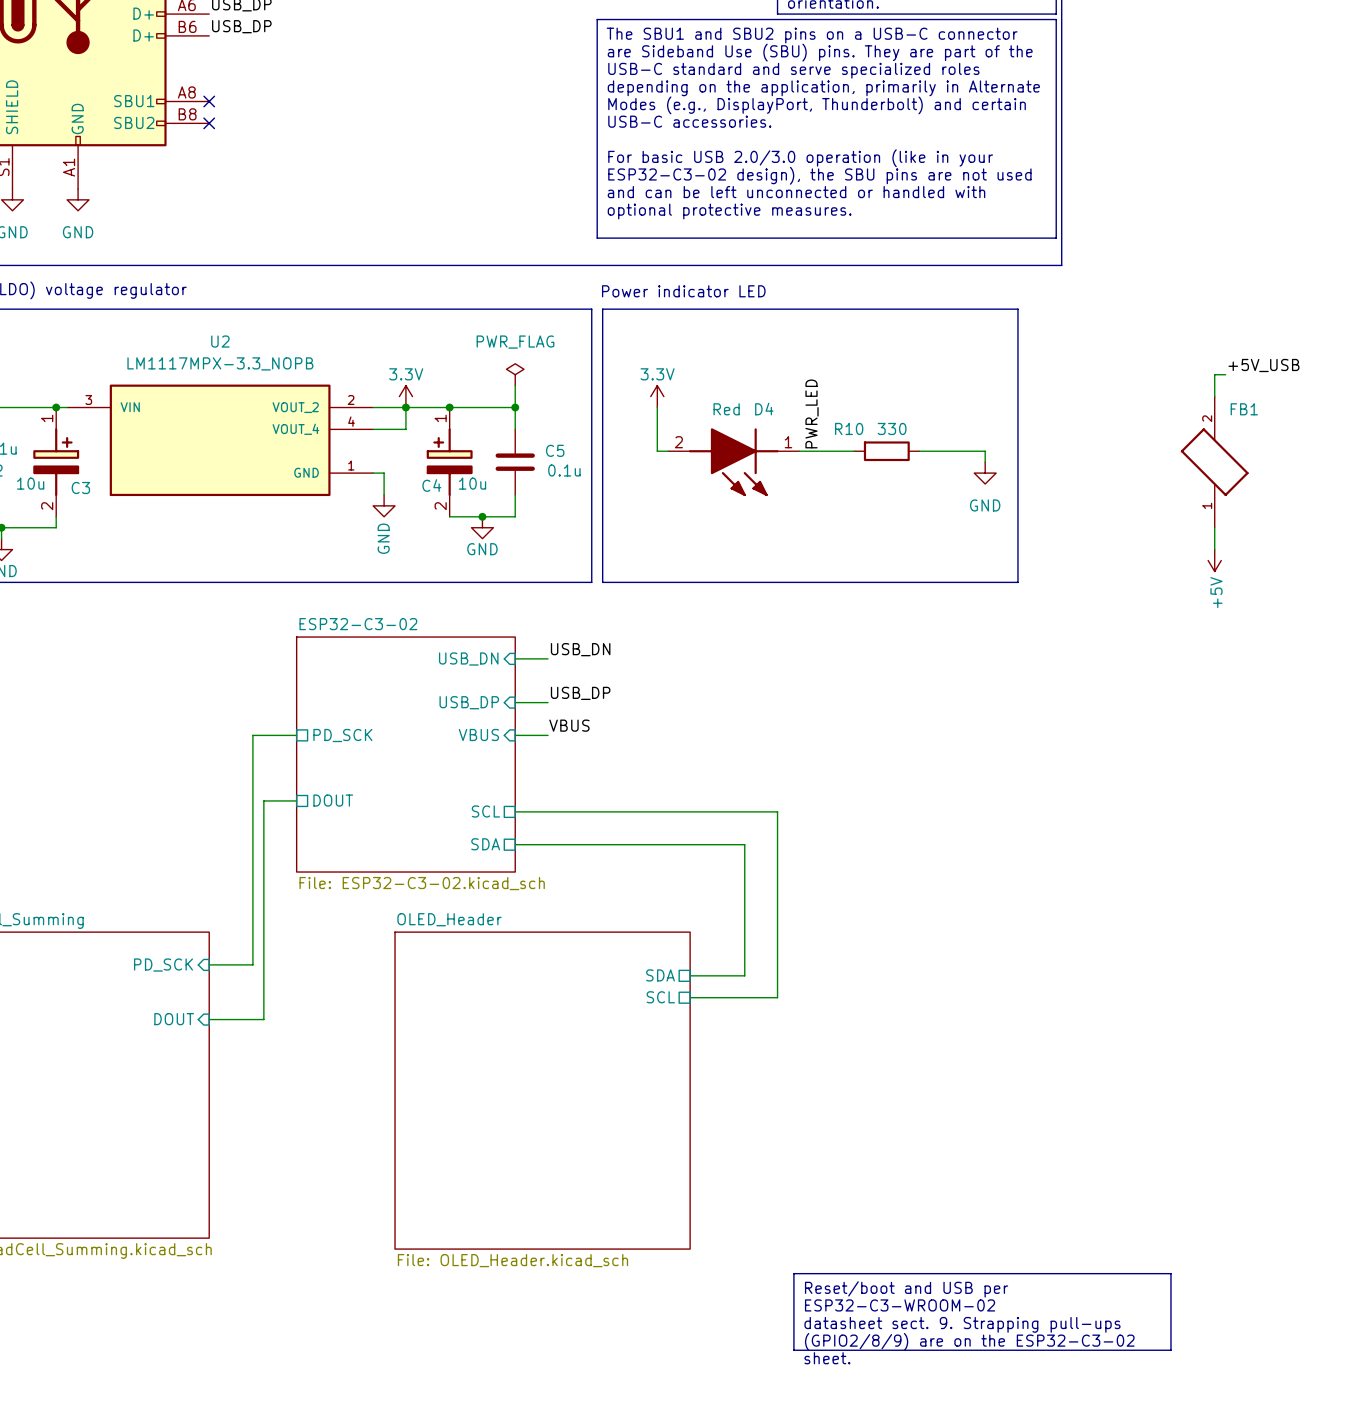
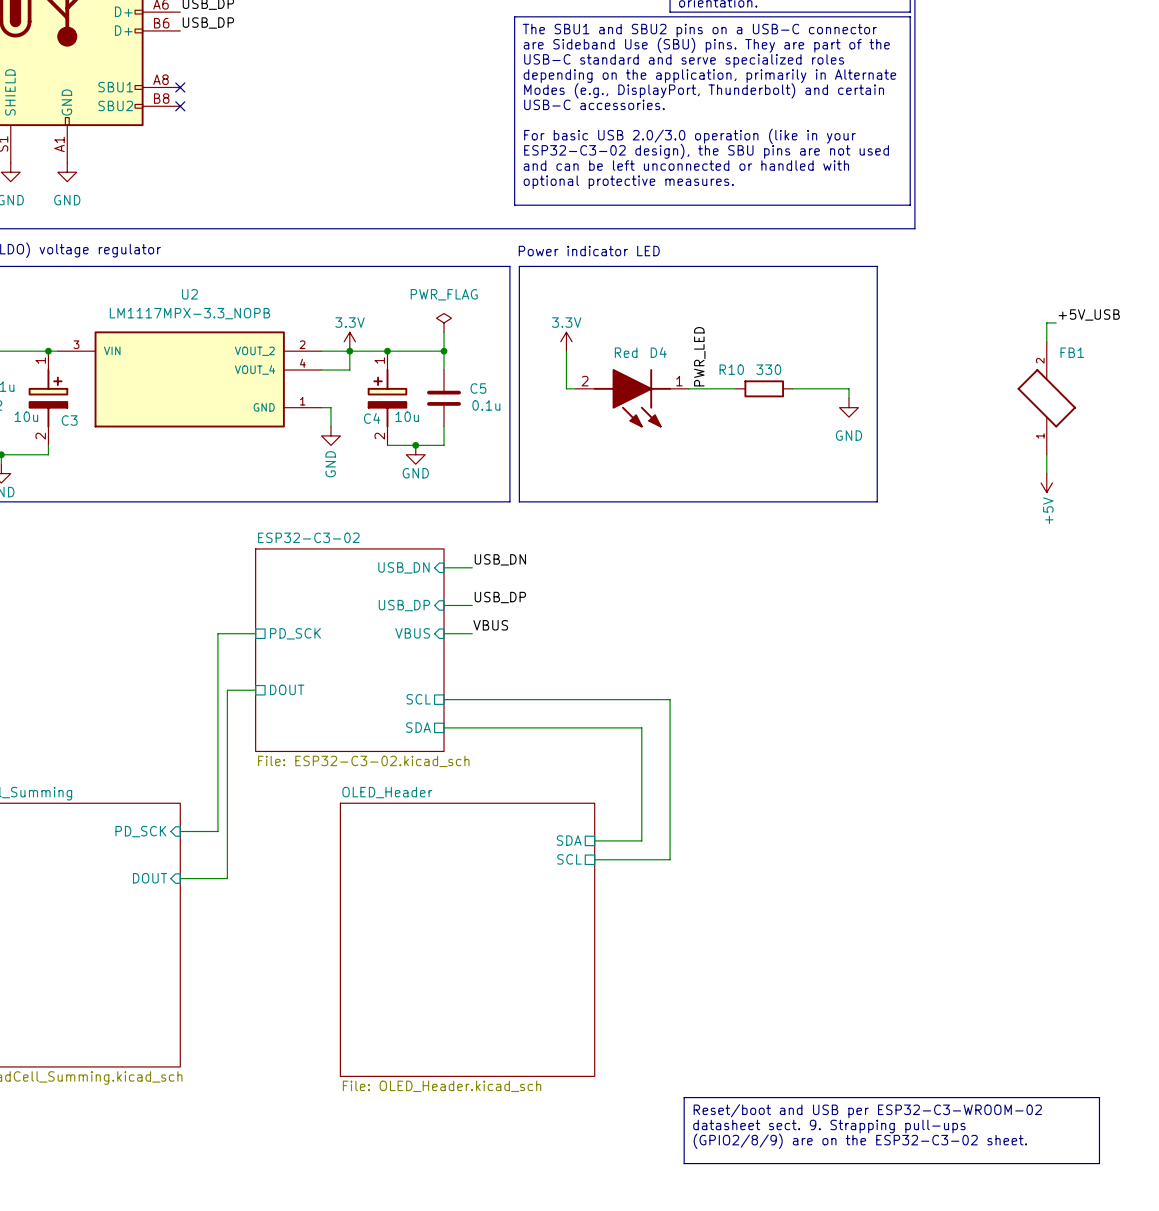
line: (1170, 1273) (1170, 1350) -> (1009, 1097) (1099, 1097) (1099, 1163) (1009, 1163)
text: Reset/boot and USB per (906, 1289) -> Reset/boot and USB per ESP32-C3-WROOM-02 (867, 1111)
text: ESP32-C3-WROOM-02 (900, 1305) -> datasheet sect. 9. Strapping pull-ups (829, 1126)
text: datasheet sect. 9. Strapping pull-ups (962, 1324) -> (GPIO2/8/9) are on the ESP32-C3-02 sheet. (860, 1141)
text: (GPIO2/8/9) are on the ESP32-C3-02 (969, 1341) -> none
text: sheet. (827, 1358) -> none

